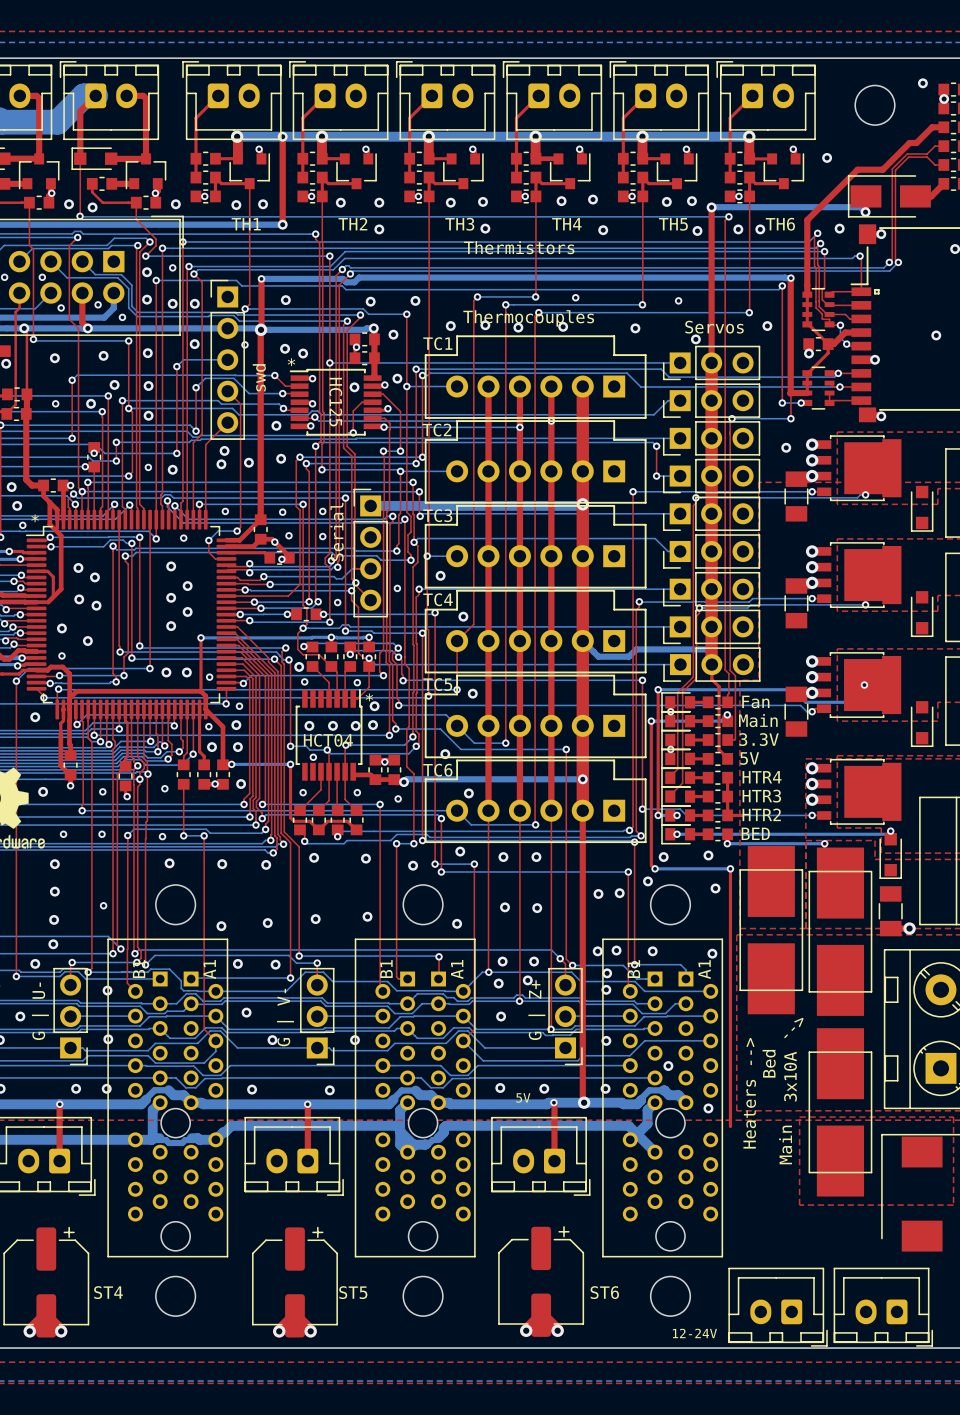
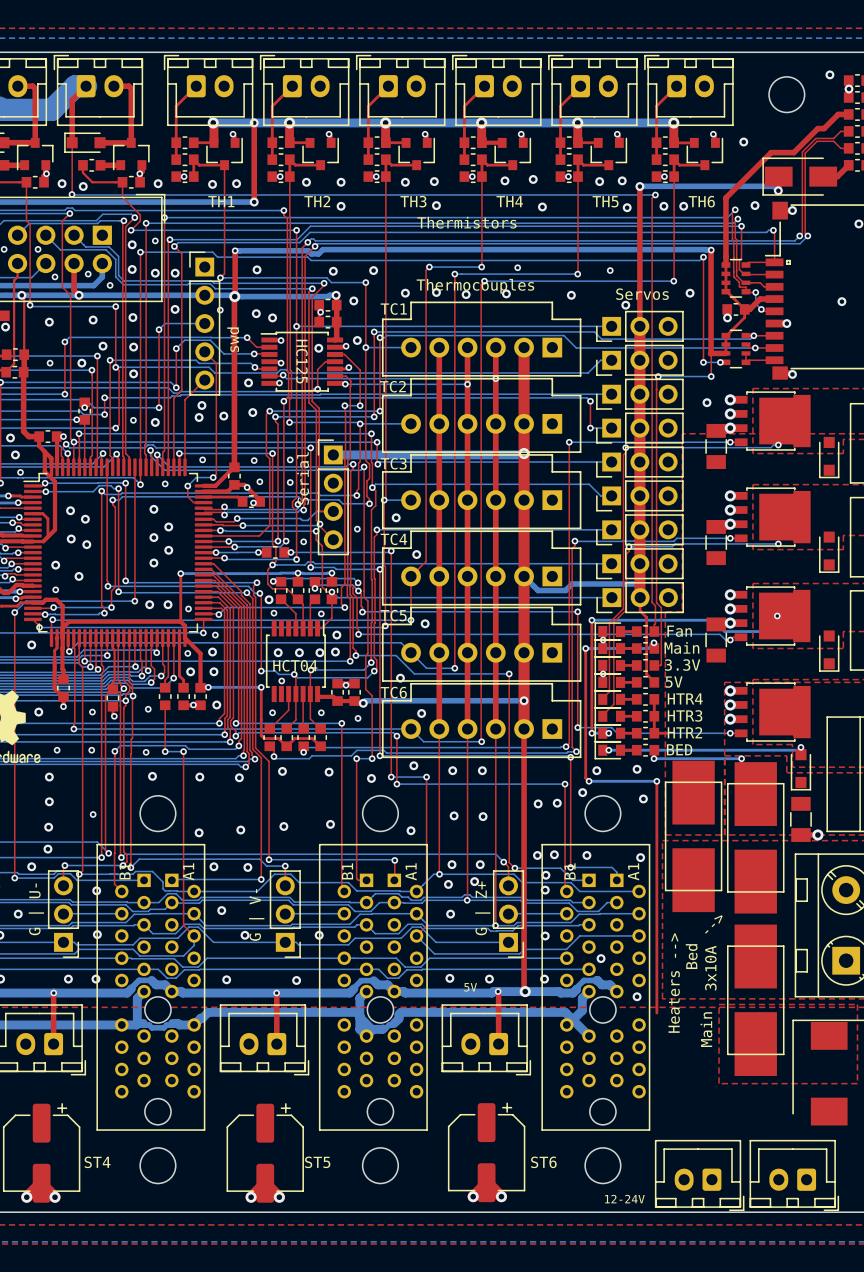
text: * (291, 362) -> none
text: * (35, 518) -> none
text: * (369, 697) -> none

